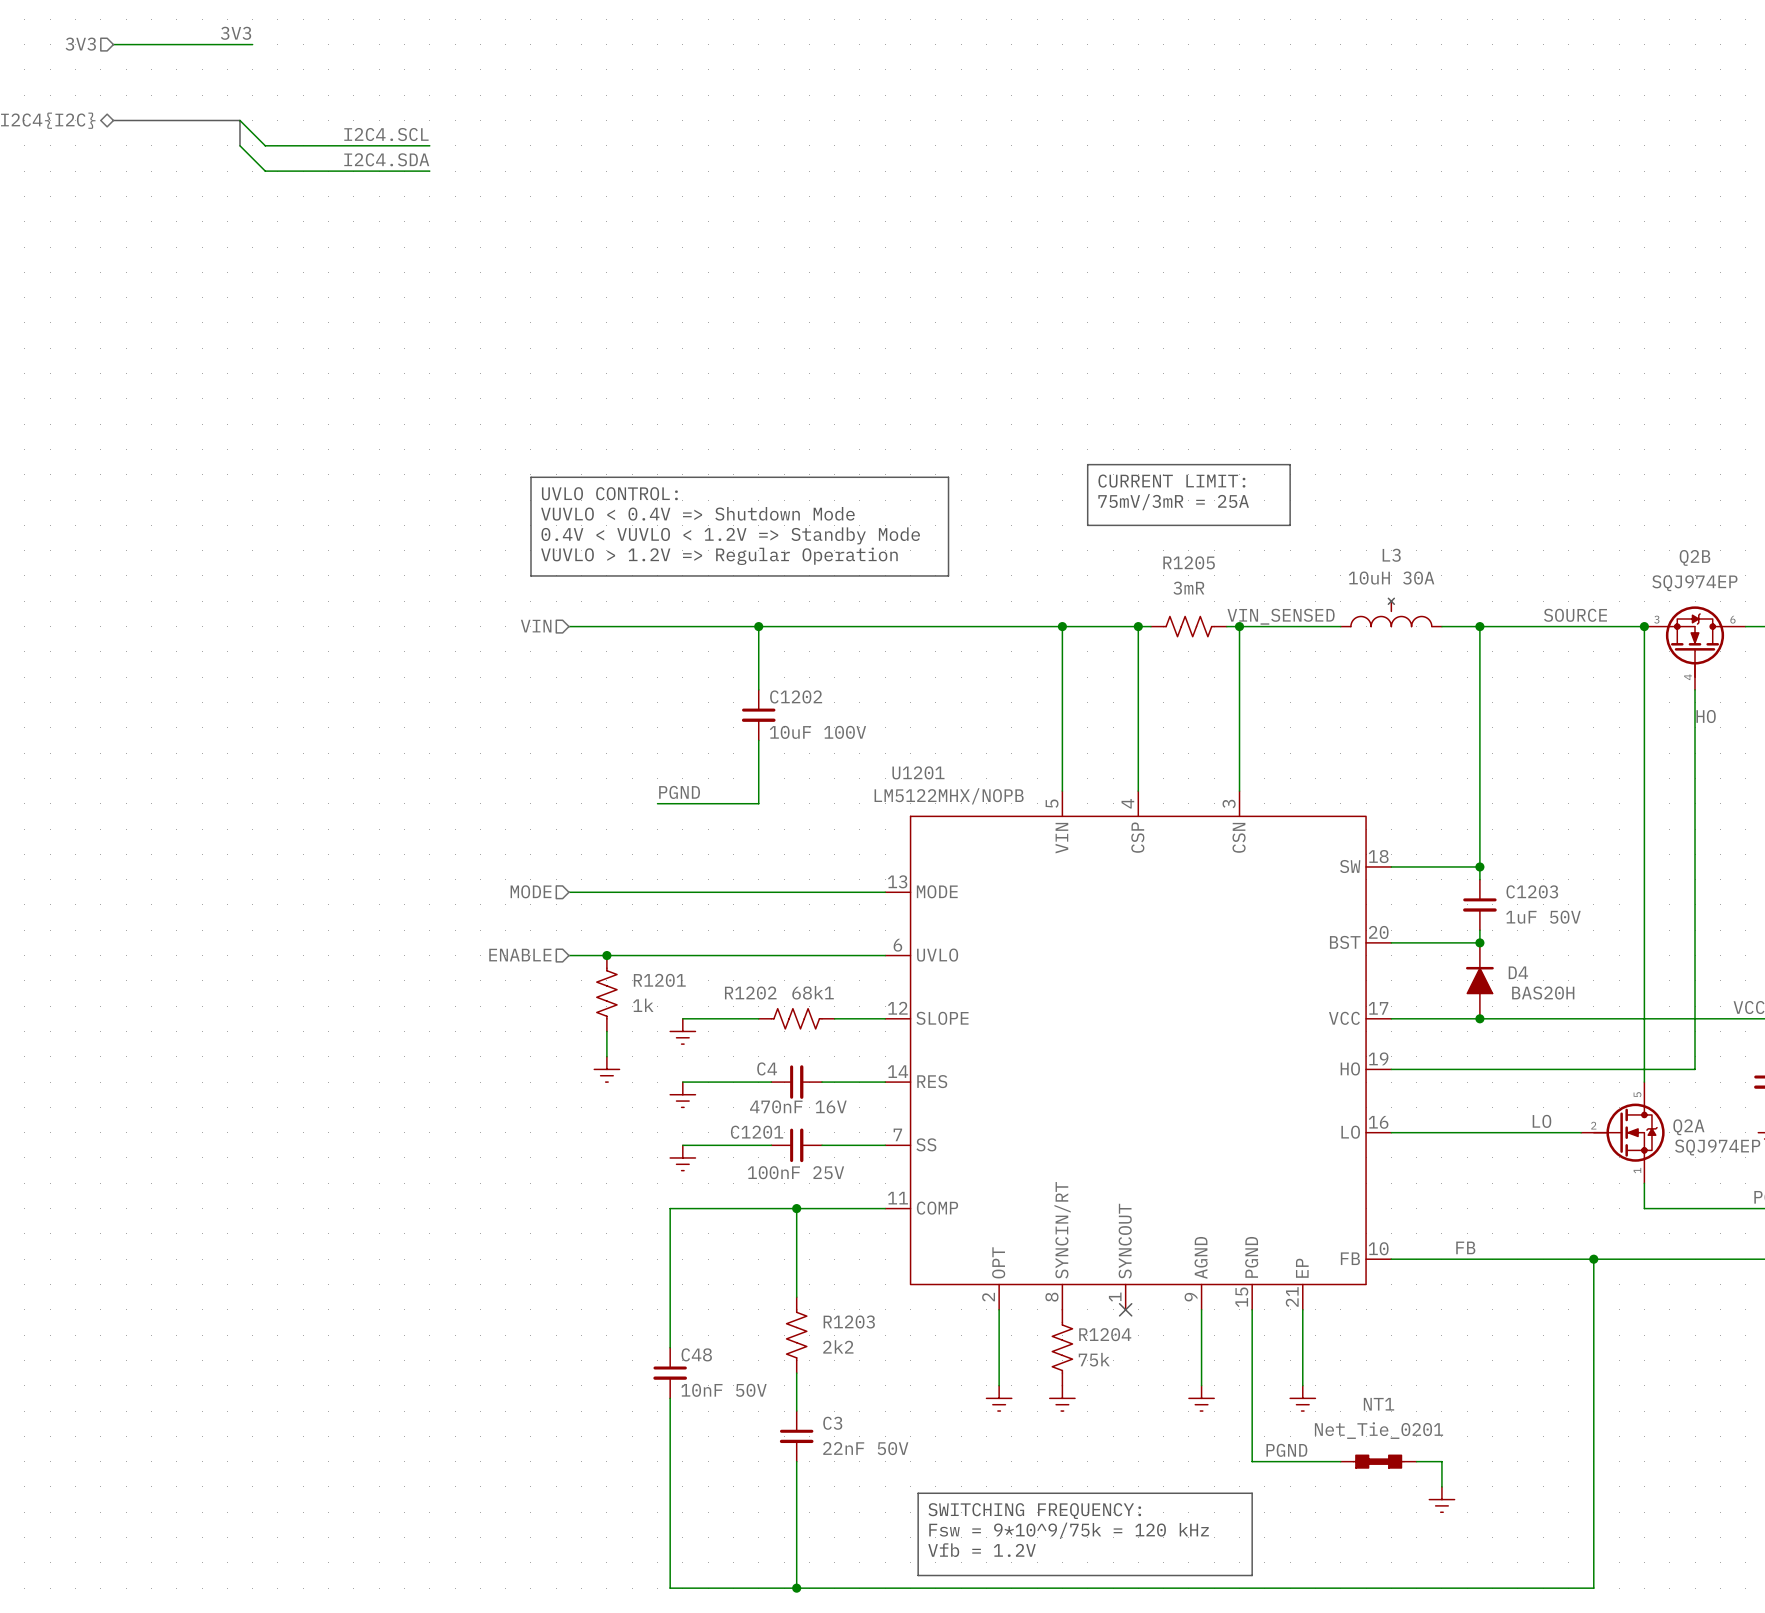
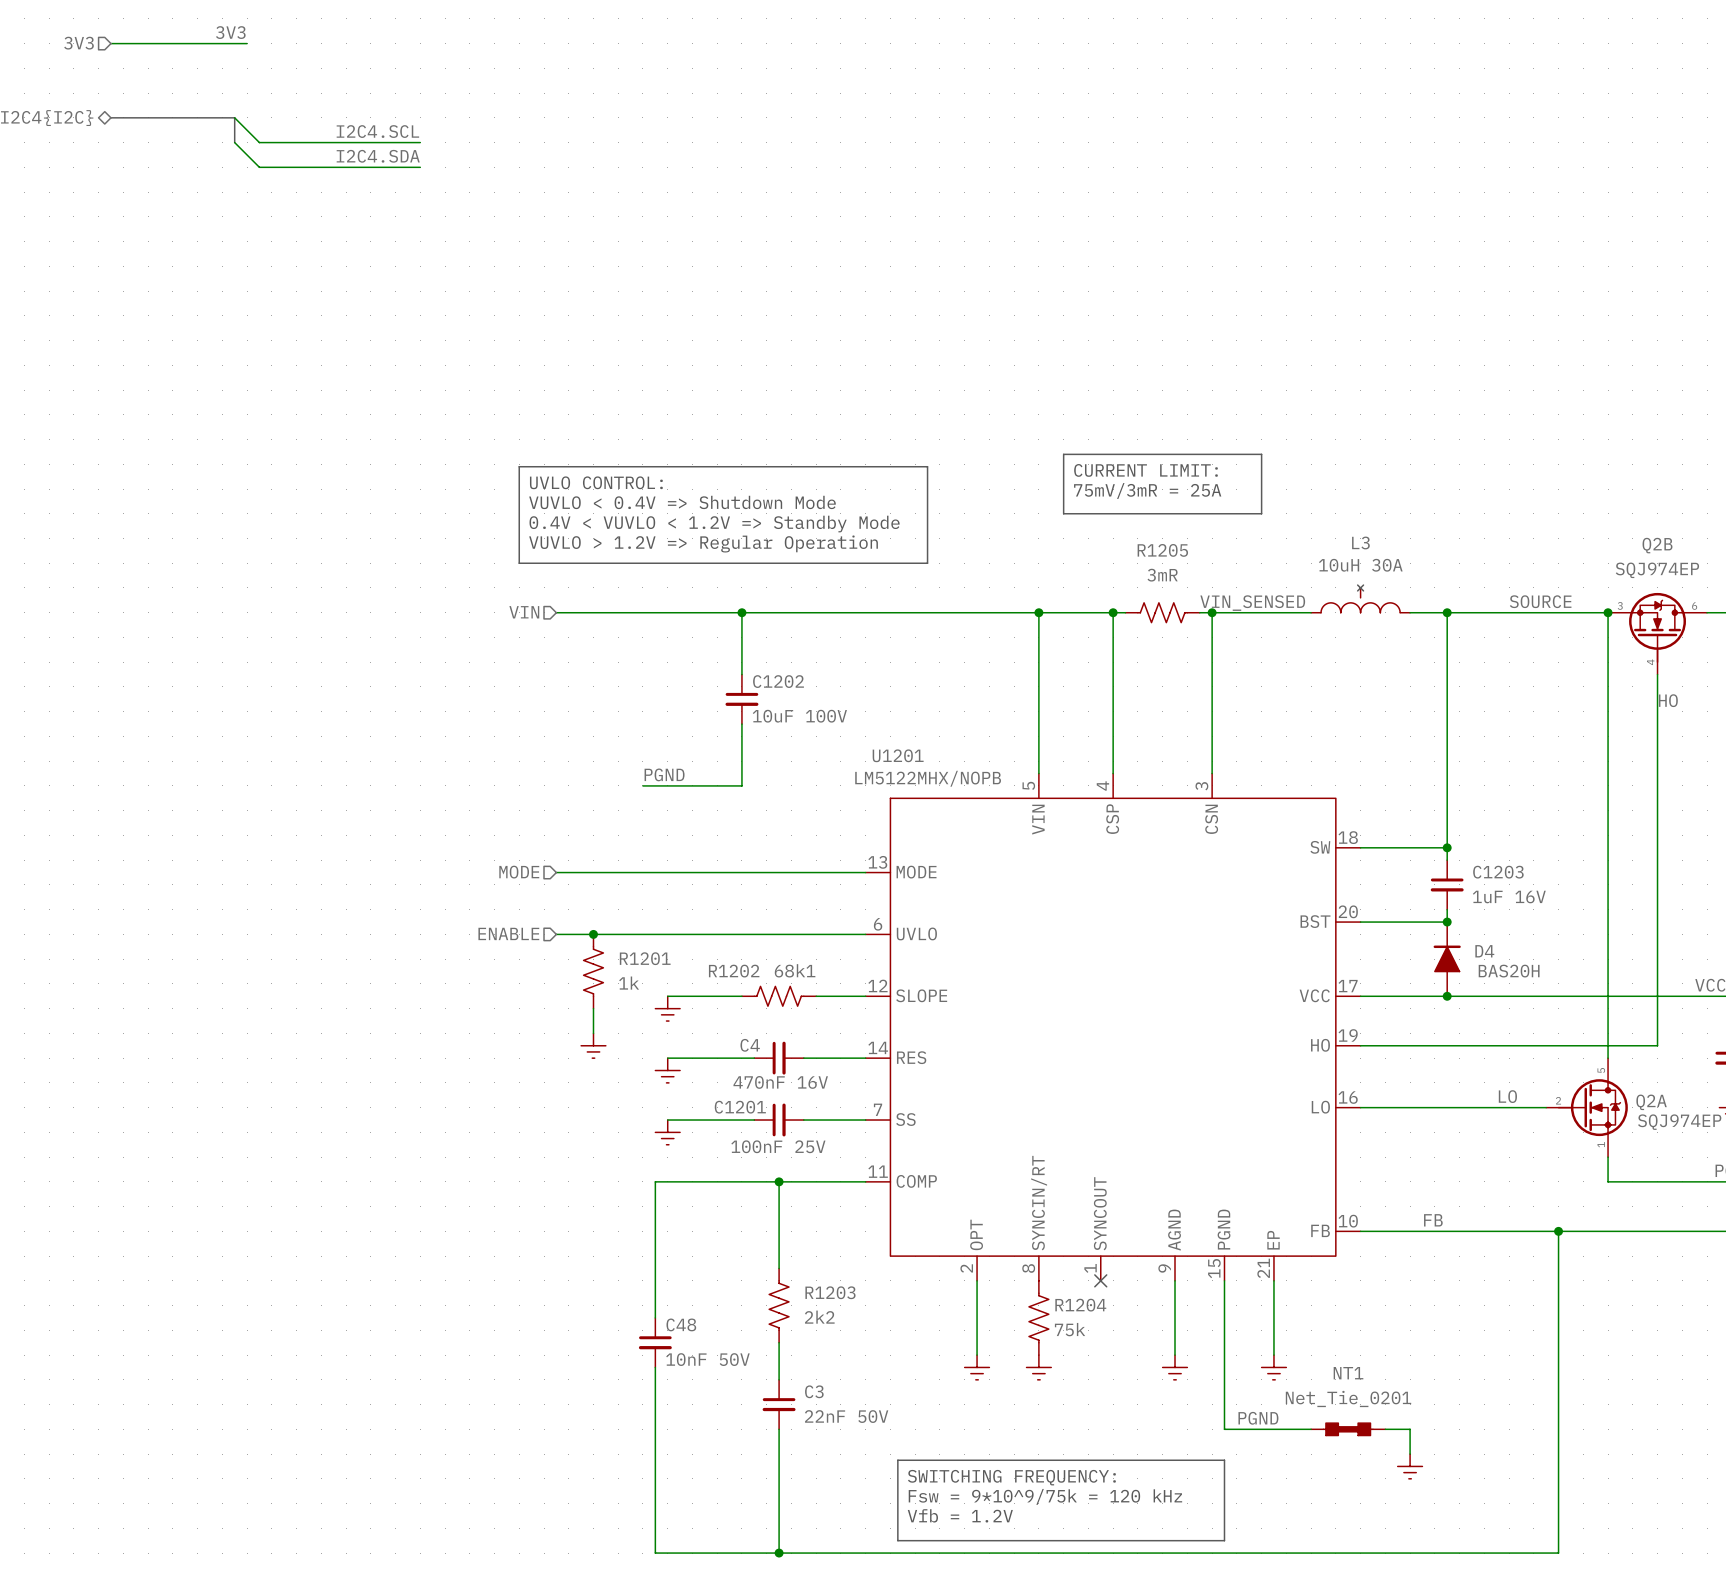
C1203 value: 1uF 50V (1543, 917) -> 1uF 16V (1509, 897)

